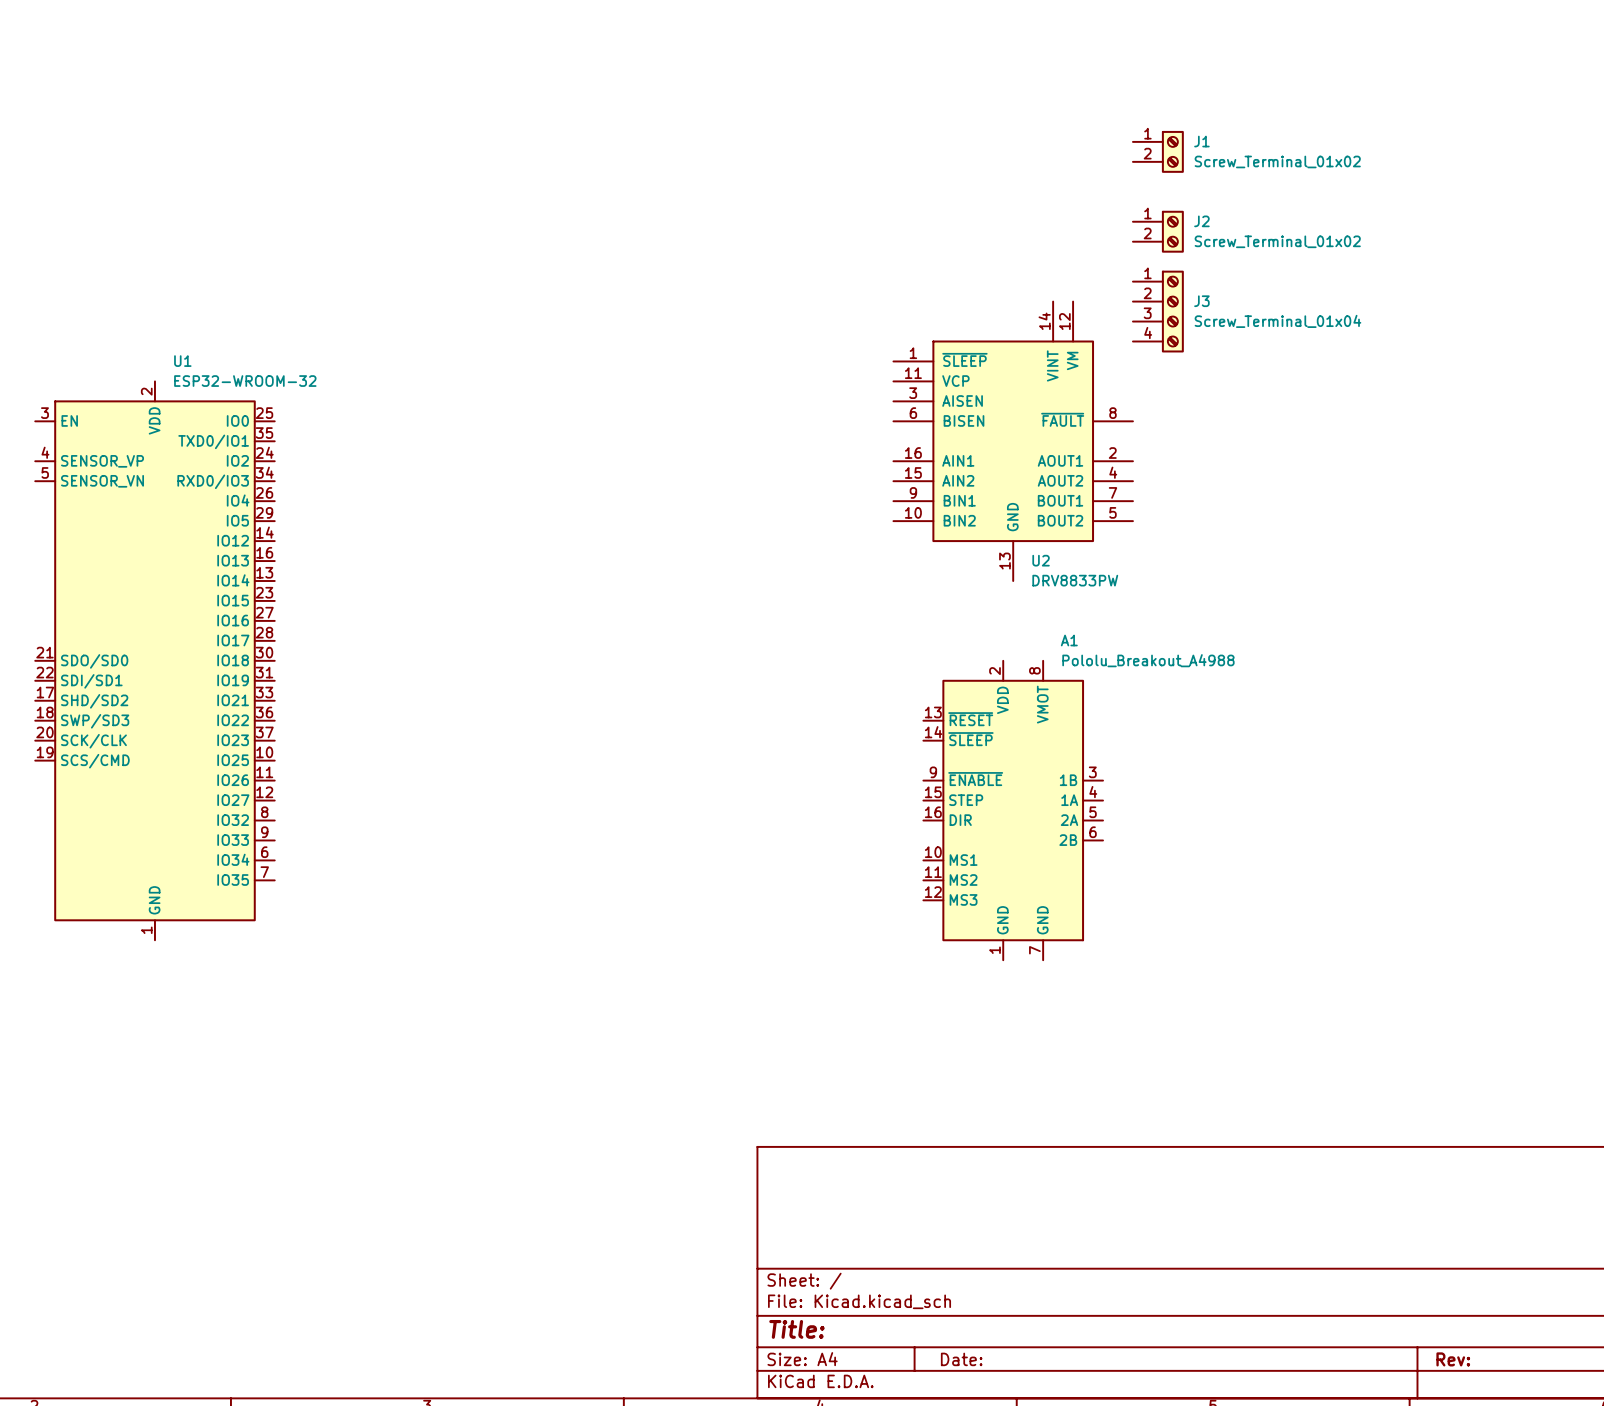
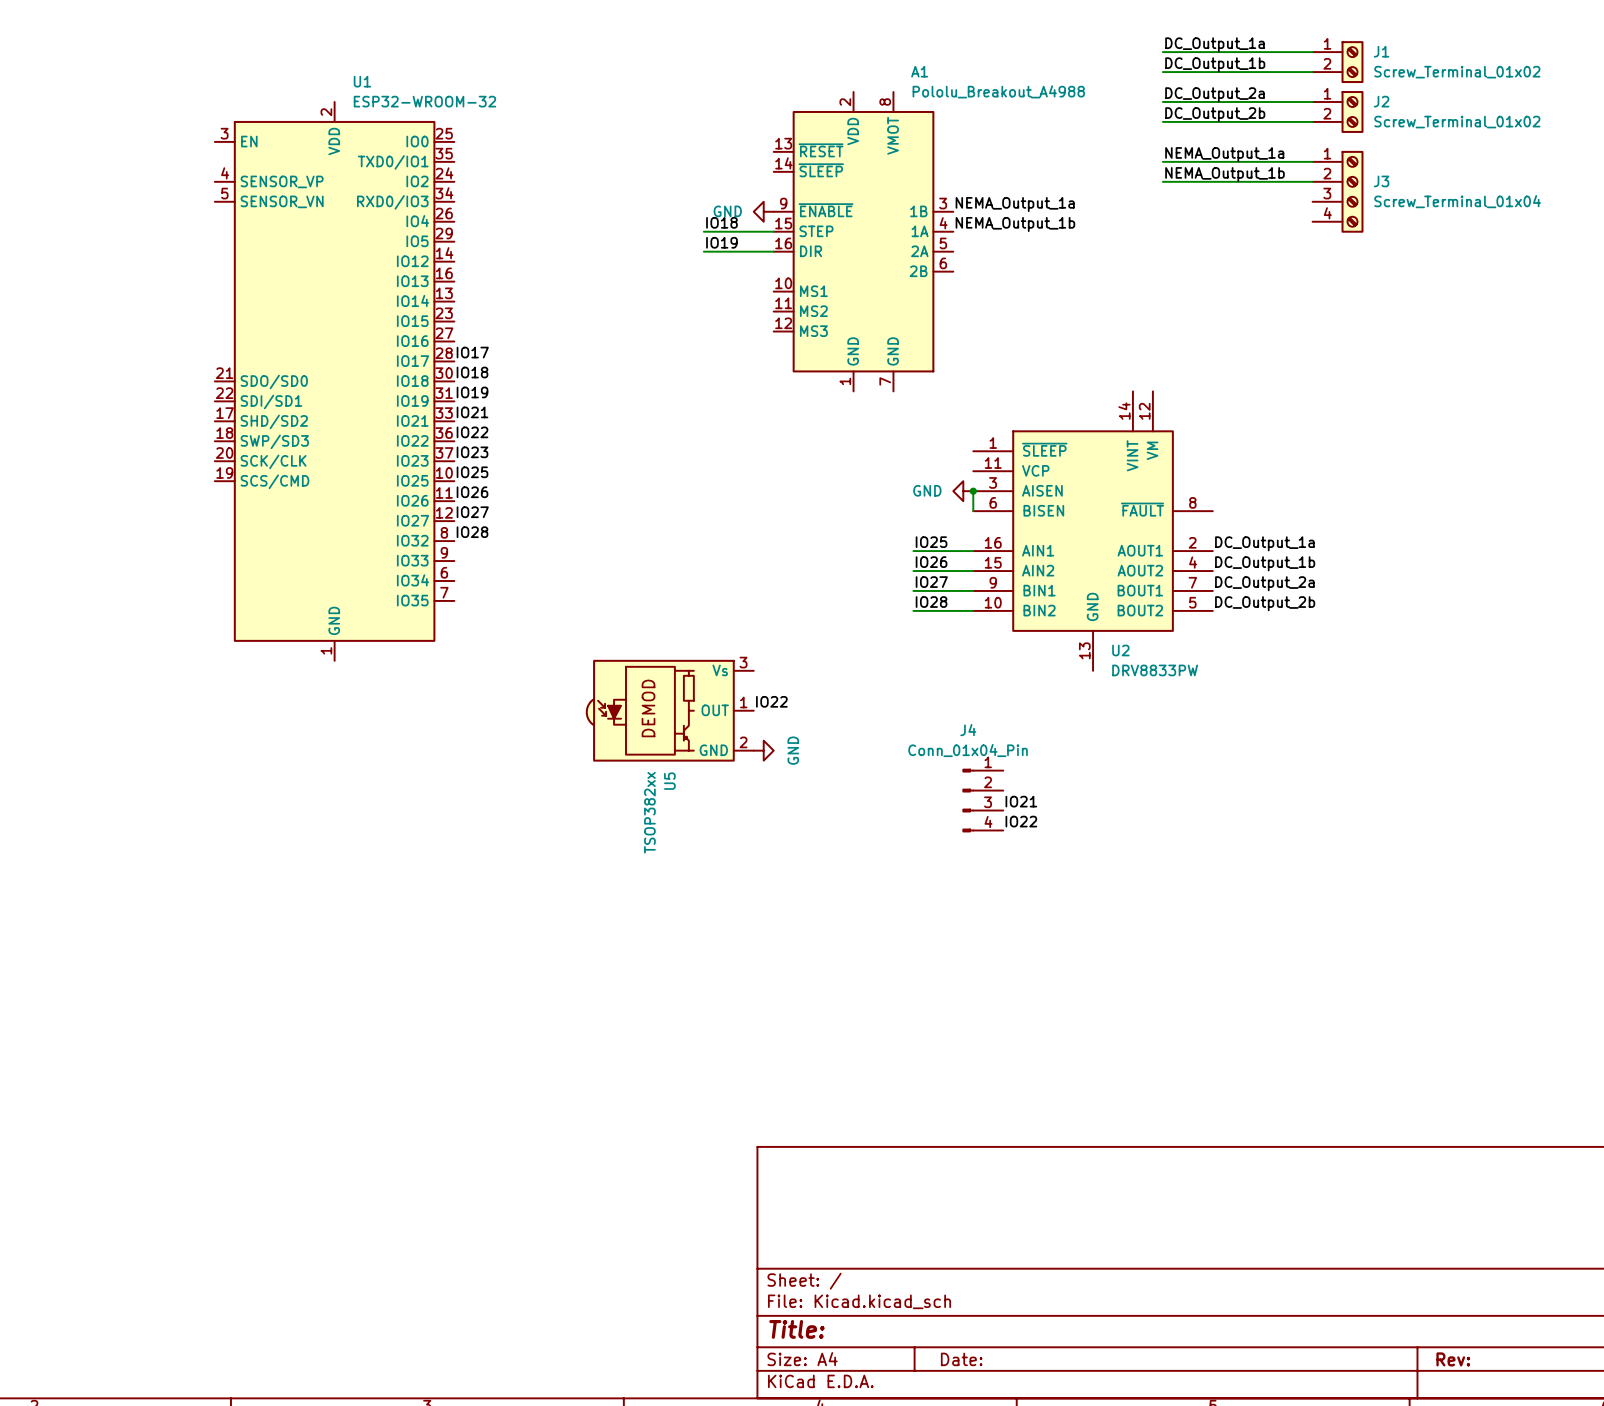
label: none -> DC_Output_1a (1215, 44)
wire: none -> (1162, 52) (1312, 52)
label: none -> DC_Output_1b (1215, 64)
wire: none -> (1162, 72) (1312, 72)
label: none -> DC_Output_2a (1215, 94)
wire: none -> (1162, 101) (1312, 101)
label: none -> DC_Output_2b (1215, 114)
wire: none -> (1162, 121) (1312, 121)
J1 position: (1158, 151) -> (1338, 62)
label: none -> NEMA_Output_1a (1224, 154)
wire: none -> (1162, 161) (1312, 161)
label: none -> NEMA_Output_1b (1224, 174)
wire: none -> (1162, 181) (1312, 181)
label: none -> NEMA_Output_1a (1015, 204)
power symbol: none -> GND (763, 211)
label: none -> IO18 (721, 222)
label: none -> NEMA_Output_1b (1015, 224)
wire: none -> (703, 231) (773, 231)
J2 position: (1158, 231) -> (1338, 111)
label: none -> IO19 (721, 242)
wire: none -> (703, 251) (773, 251)
J3 position: (1158, 311) -> (1338, 191)
label: none -> IO17 (472, 352)
label: none -> IO18 (472, 372)
label: none -> IO19 (472, 392)
label: none -> IO21 (472, 412)
label: none -> IO22 (472, 432)
U2 position: (1013, 441) -> (1093, 531)
label: none -> IO23 (472, 452)
label: none -> IO25 (472, 472)
power symbol: none -> GND (963, 491)
junction: none -> (973, 491)
label: none -> IO26 (472, 492)
label: none -> IO27 (472, 512)
label: none -> IO28 (472, 532)
label: none -> IO25 (931, 542)
label: none -> DC_Output_1a (1264, 543)
wire: none -> (913, 551) (973, 551)
label: none -> IO26 (931, 562)
label: none -> DC_Output_1b (1265, 563)
wire: none -> (913, 571) (973, 571)
label: none -> IO27 (931, 582)
label: none -> DC_Output_2a (1264, 583)
wire: none -> (913, 590) (973, 590)
label: none -> IO28 (931, 602)
label: none -> DC_Output_2b (1265, 603)
wire: none -> (913, 610) (973, 610)
U1 position: (154, 660) -> (334, 381)
label: none -> IO22 (771, 701)
U5: none -> TSOP382xx (669, 710)
power symbol: none -> GND (763, 750)
J4: none -> Conn_01x04_Pin (982, 800)
label: none -> IO21 (1021, 801)
A1 position: (1013, 810) -> (863, 241)
label: none -> IO22 (1021, 821)

